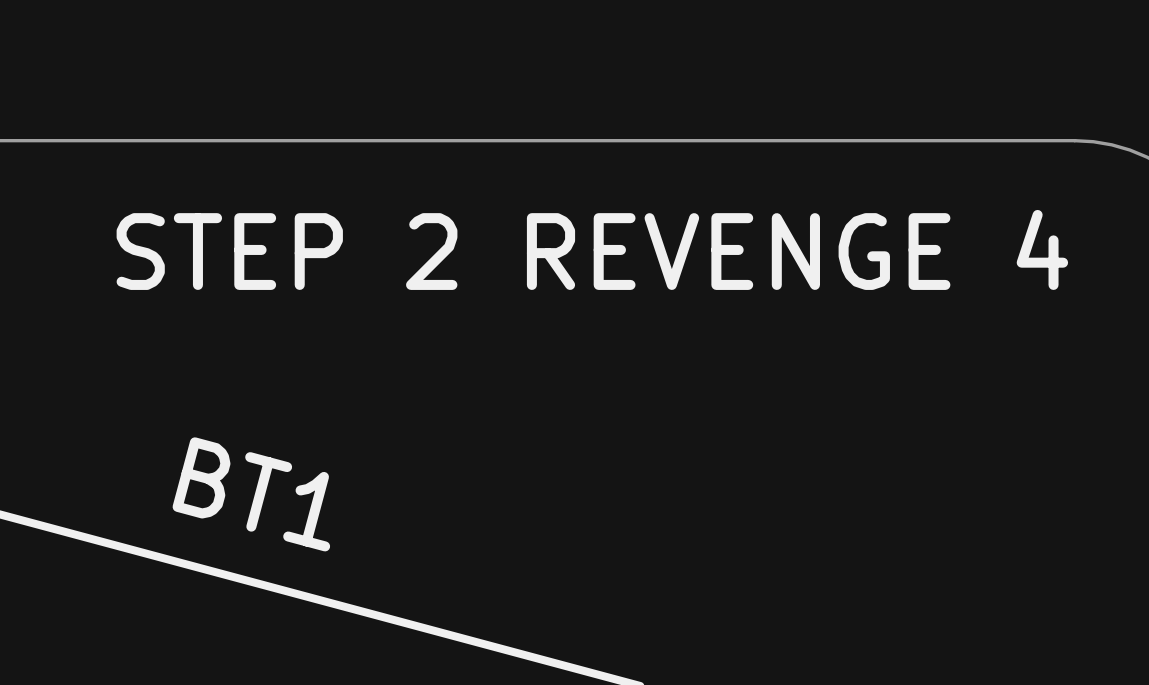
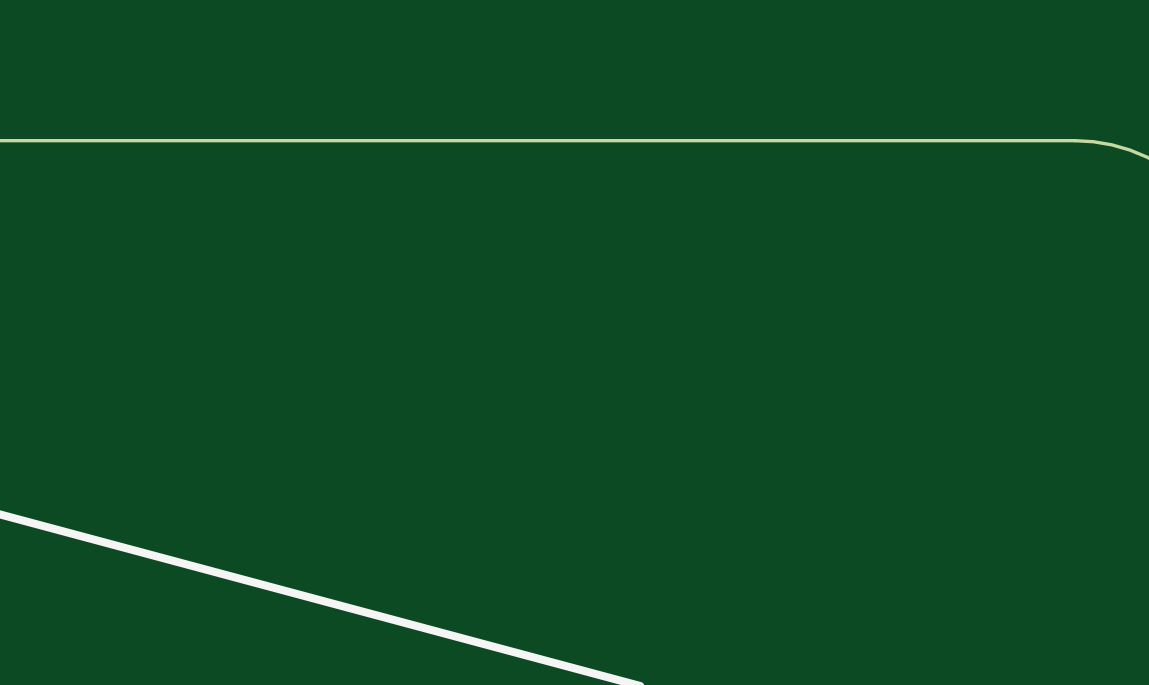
text: STEP 2 REVENGE 4 (592, 249) -> none
BT1 name: BT1 (251, 494) -> none

